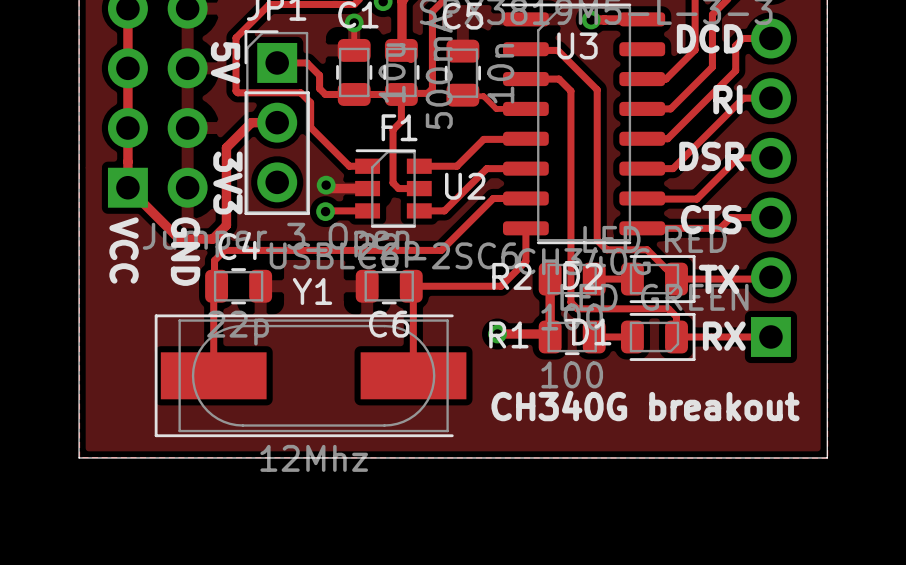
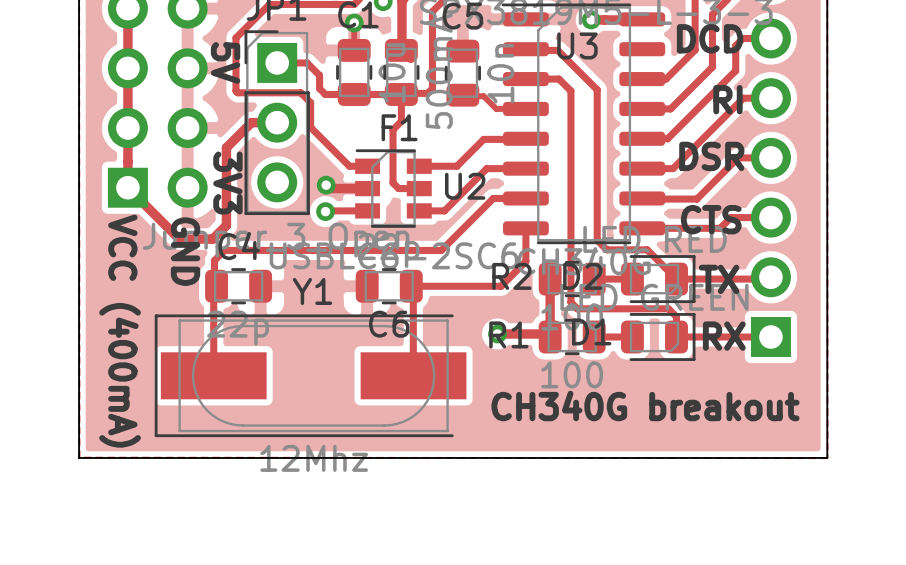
text: VCC (124, 250) -> none
text: none -> VCC (400mA) (120, 331)

